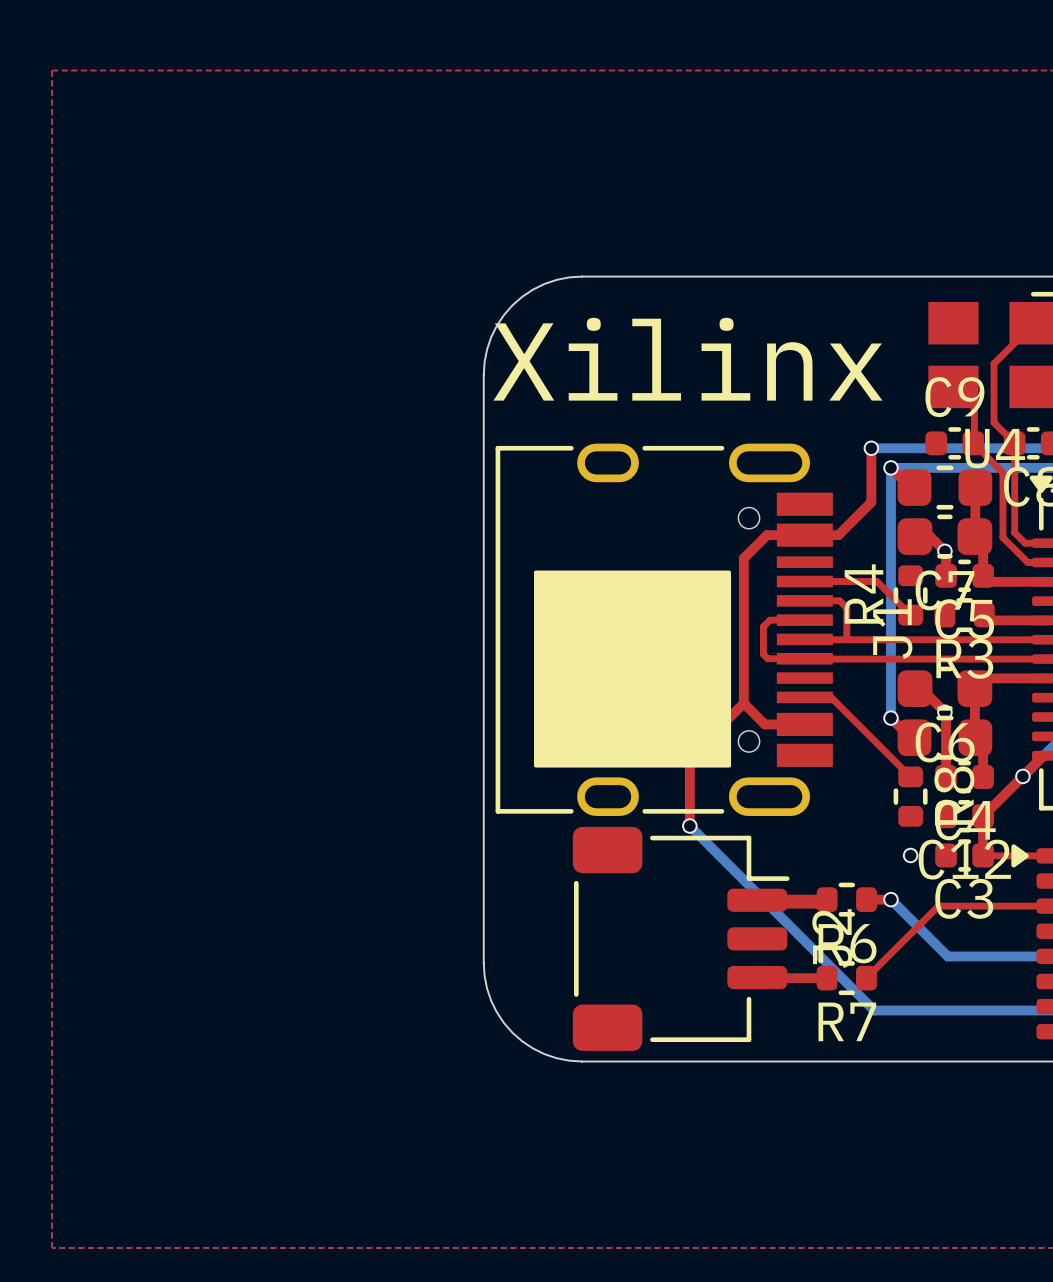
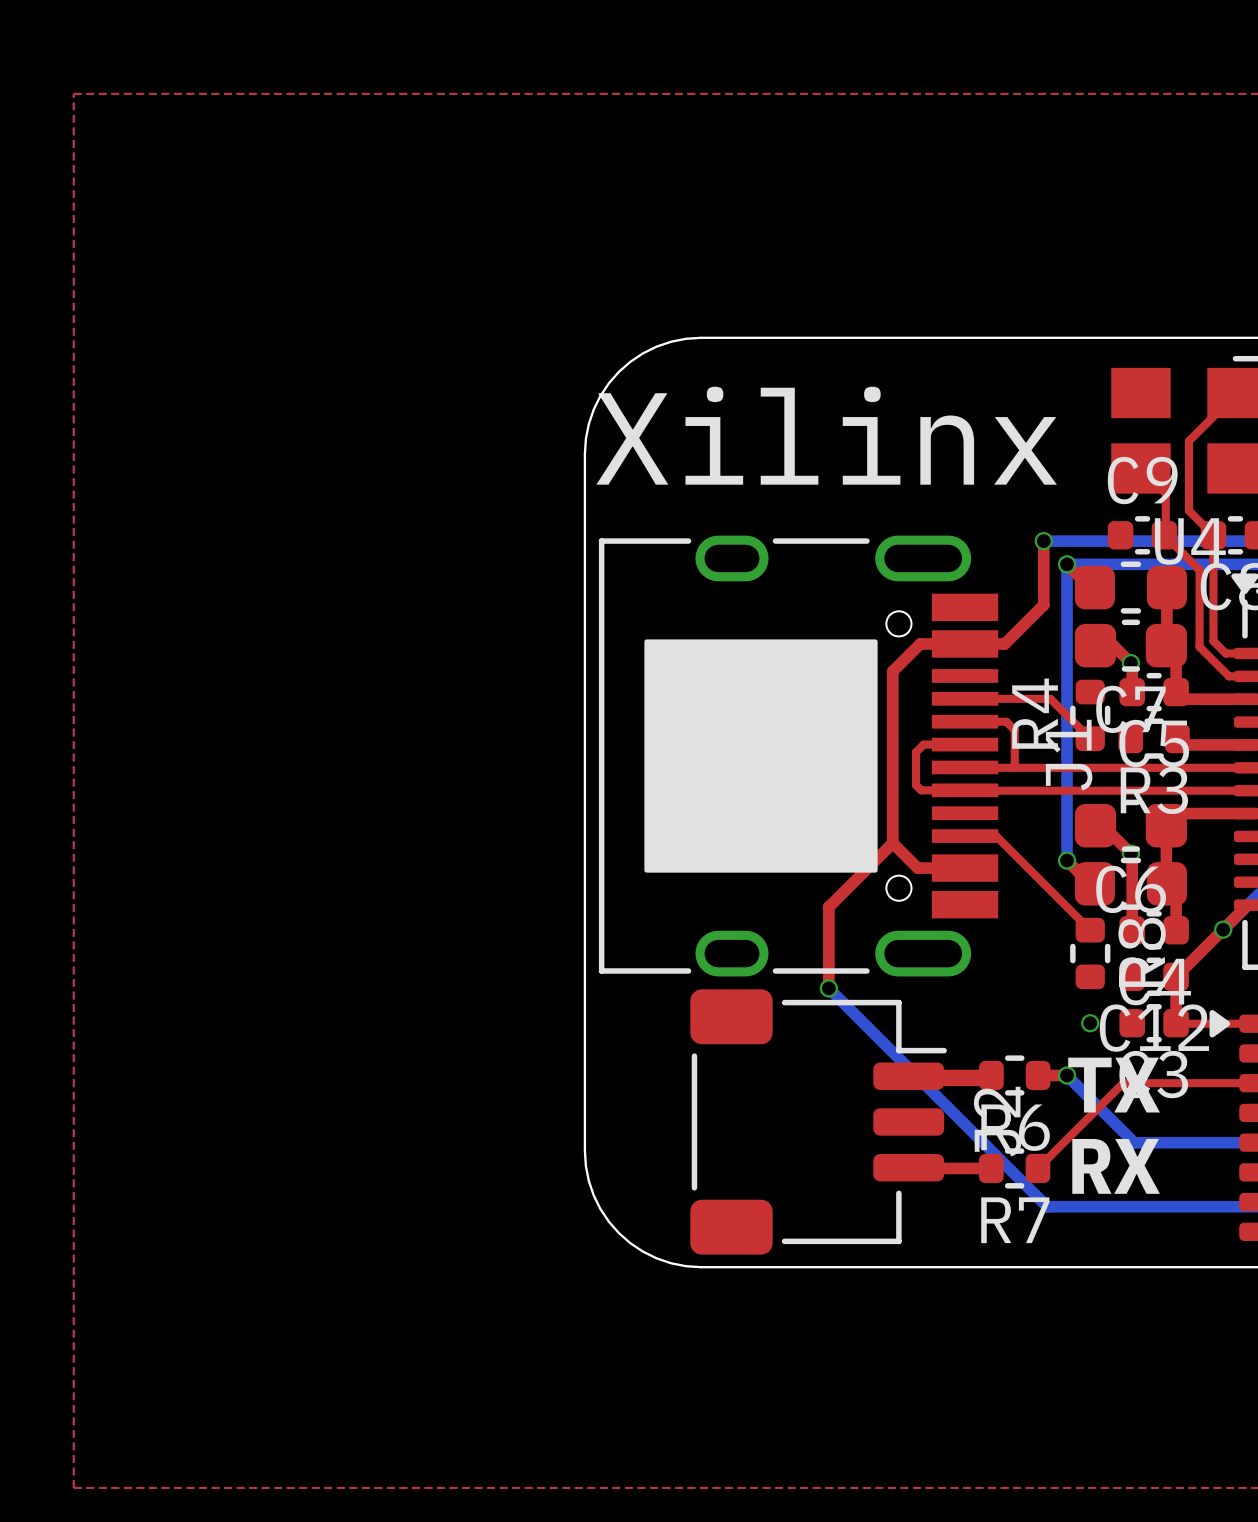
drawing position: (632, 669) -> (760, 756)
text: none -> TX (1114, 1085)
text: none -> RX (1116, 1166)

